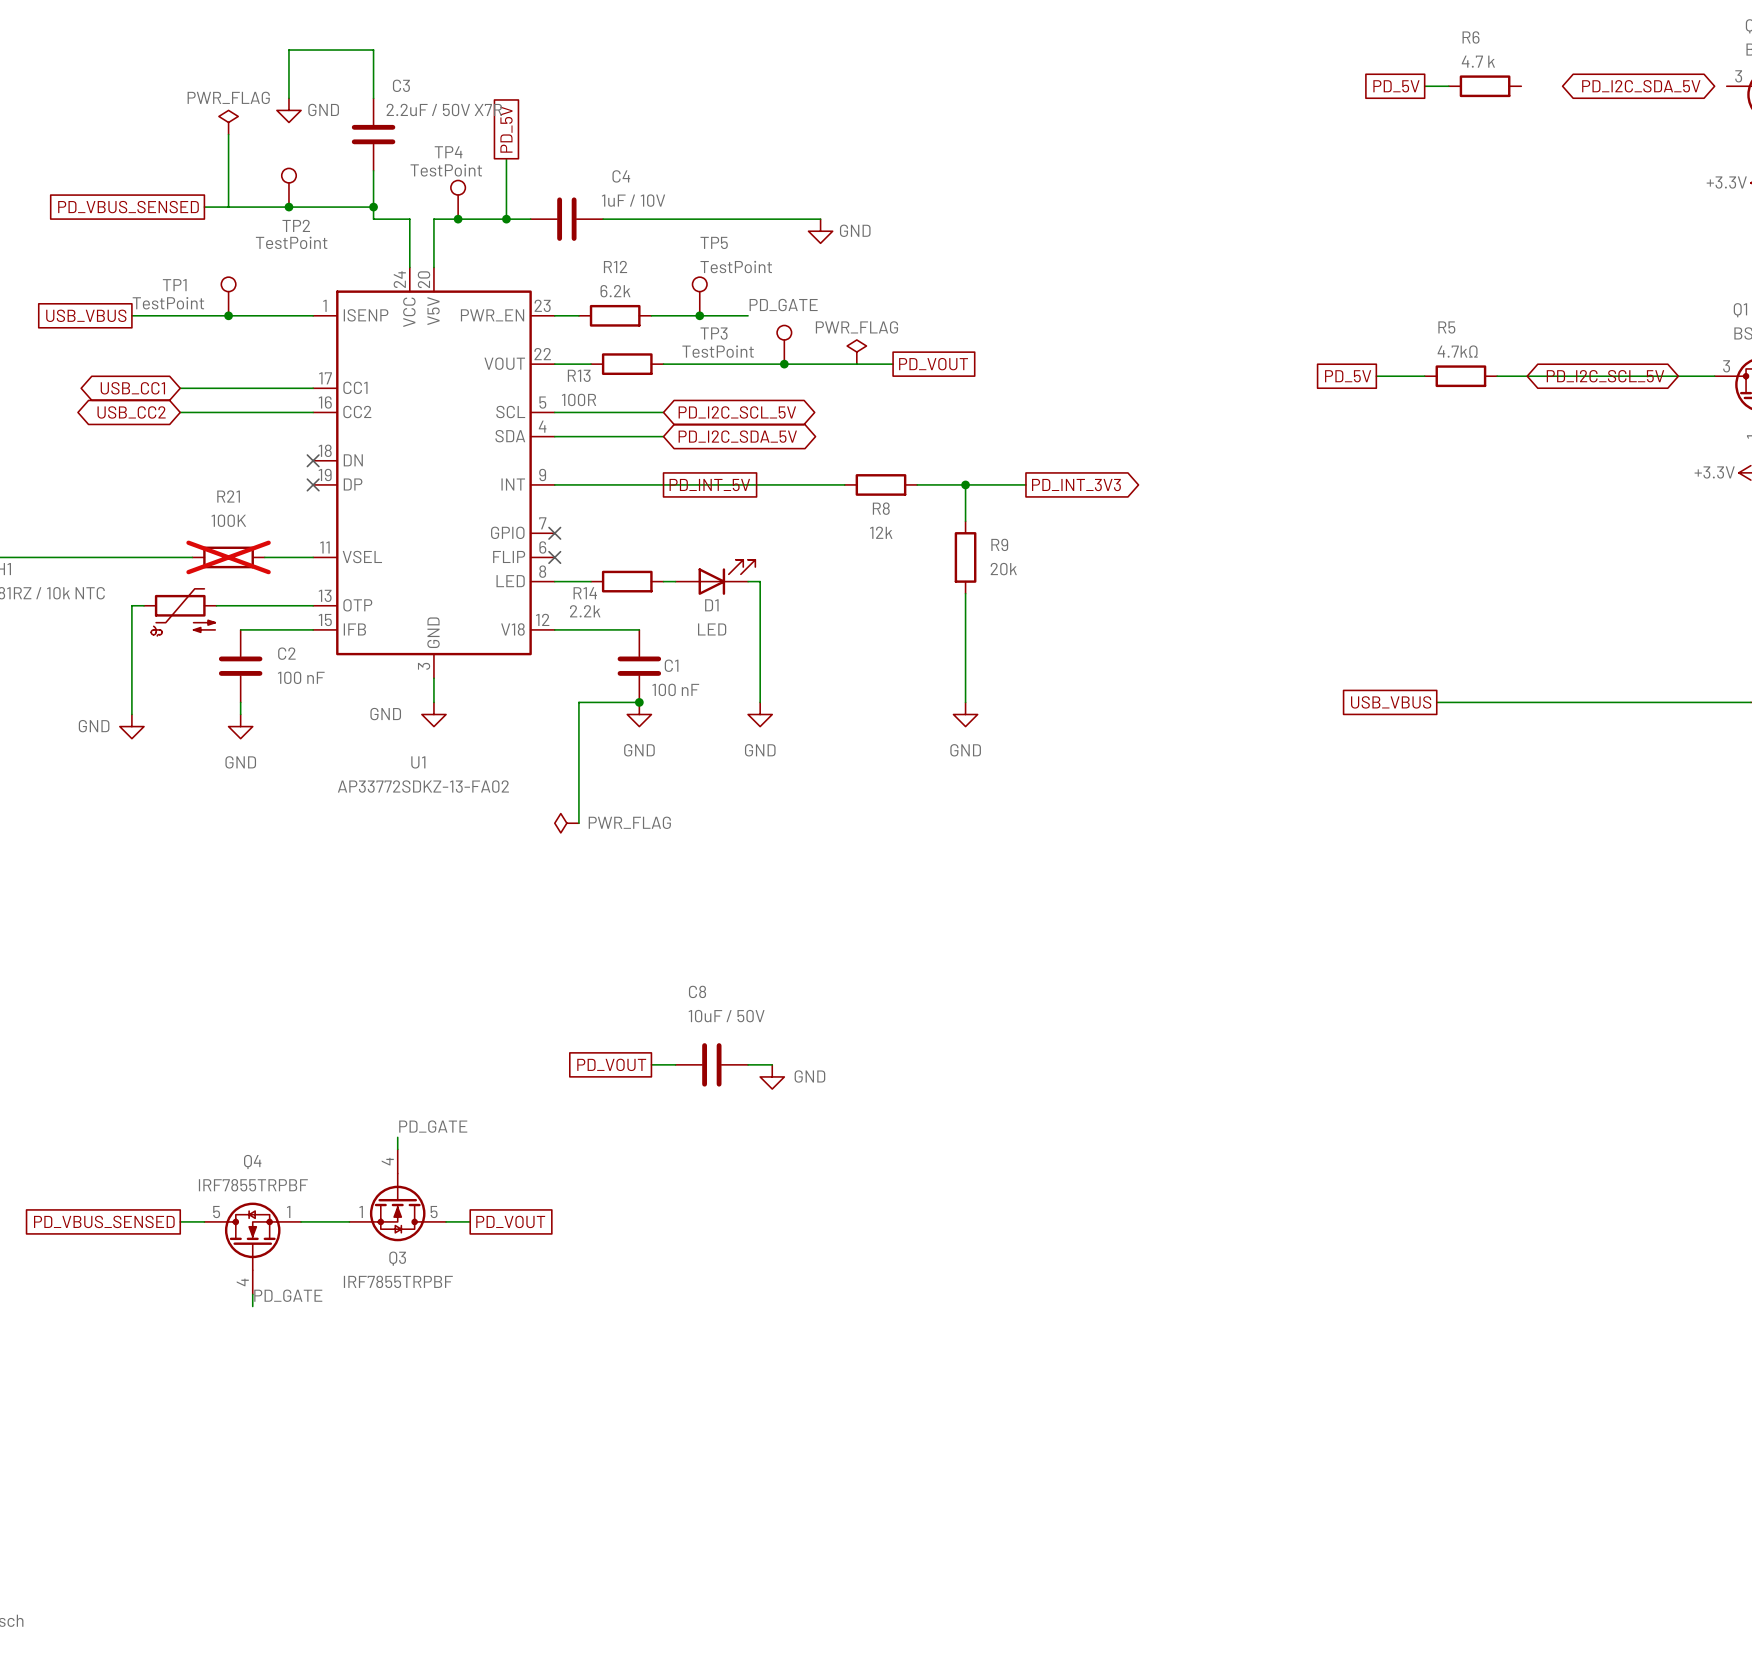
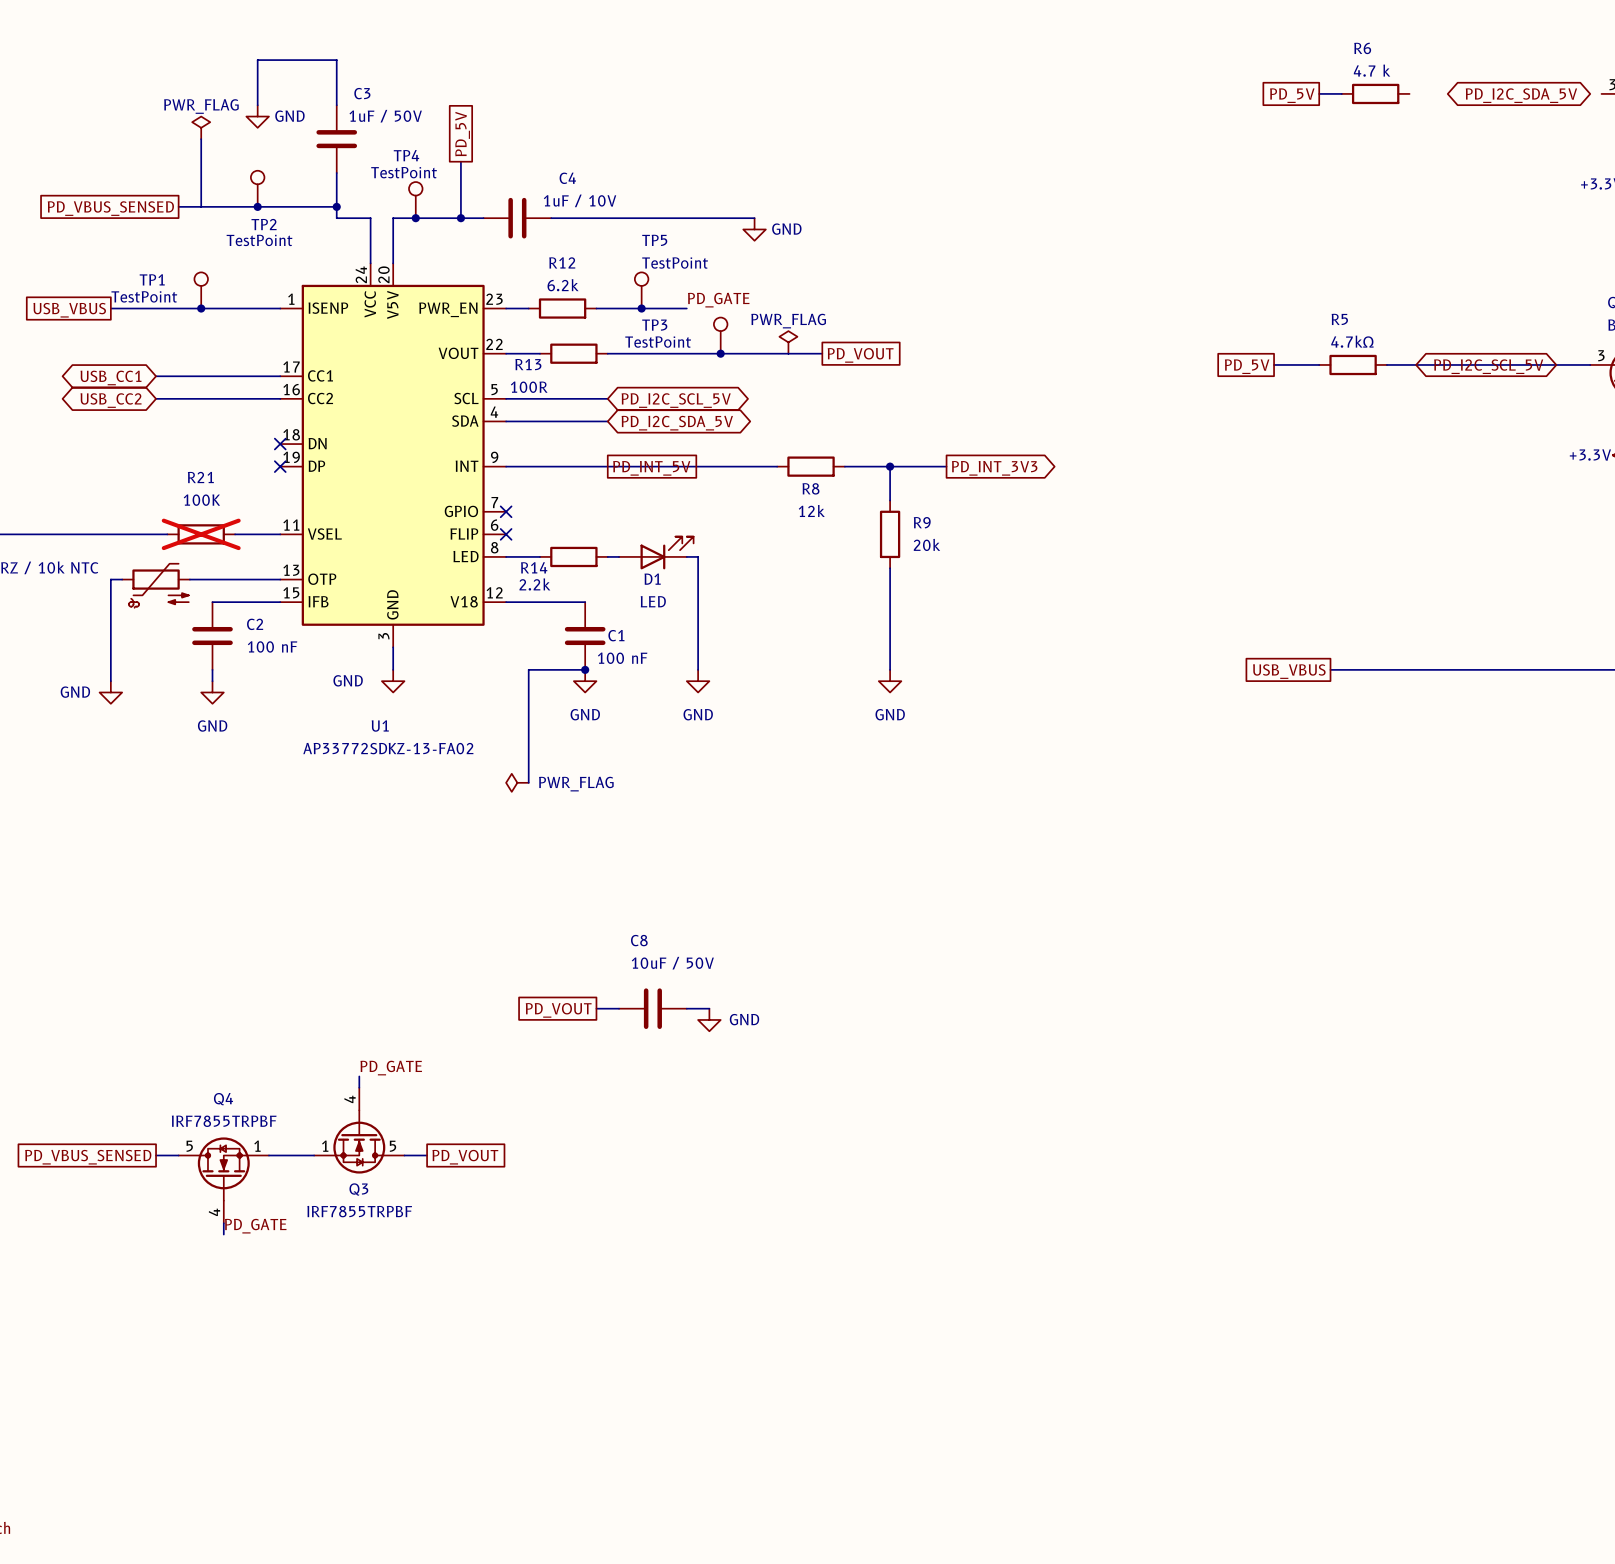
C3 value: 2.2uF / 50V X7R (444, 109) -> 1uF / 50V (385, 116)

